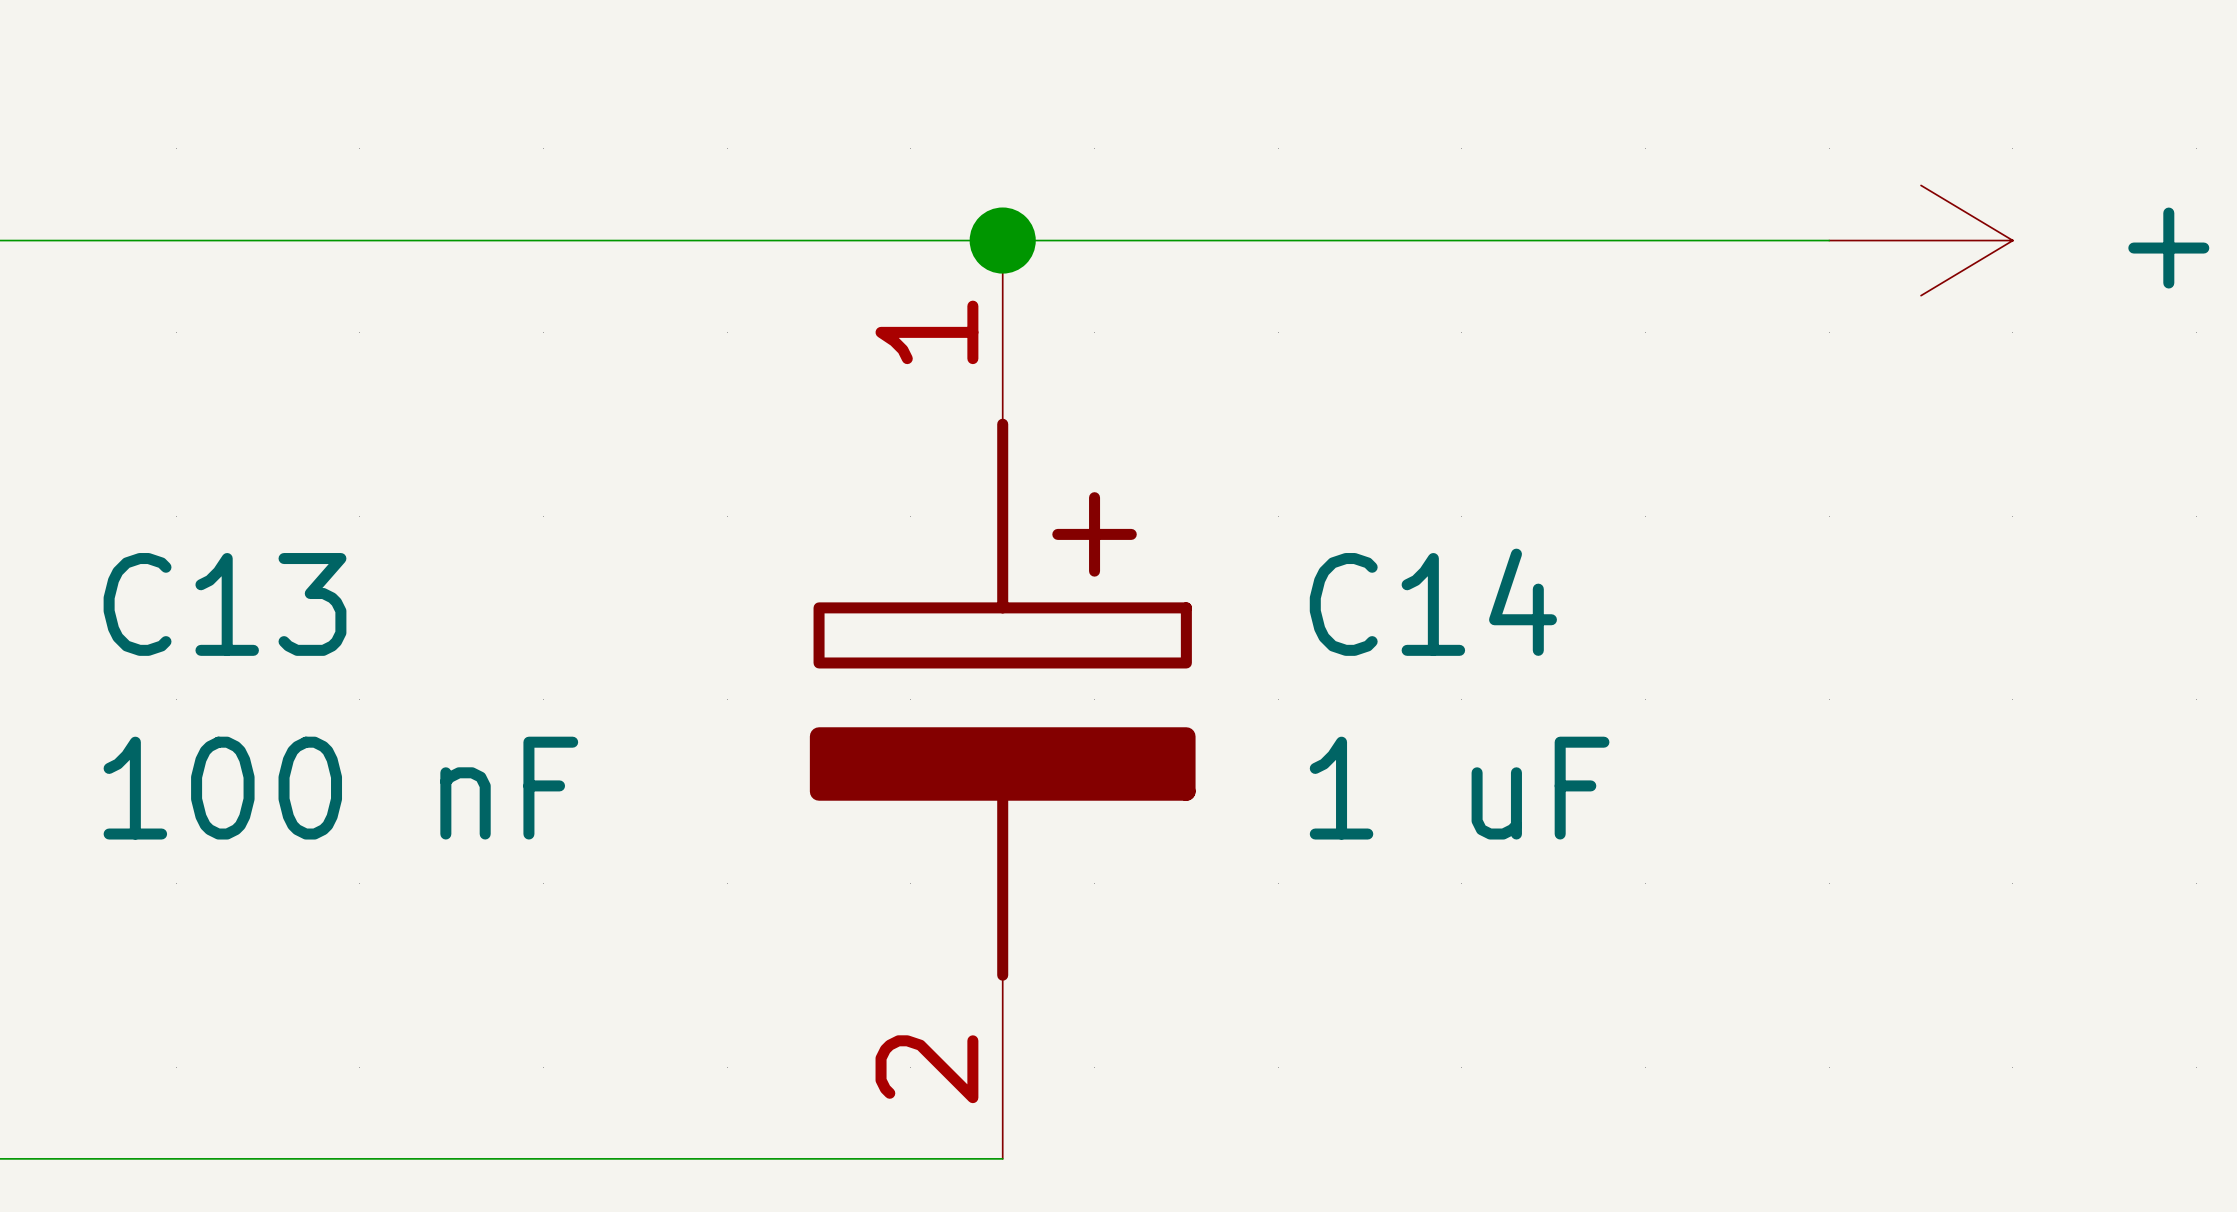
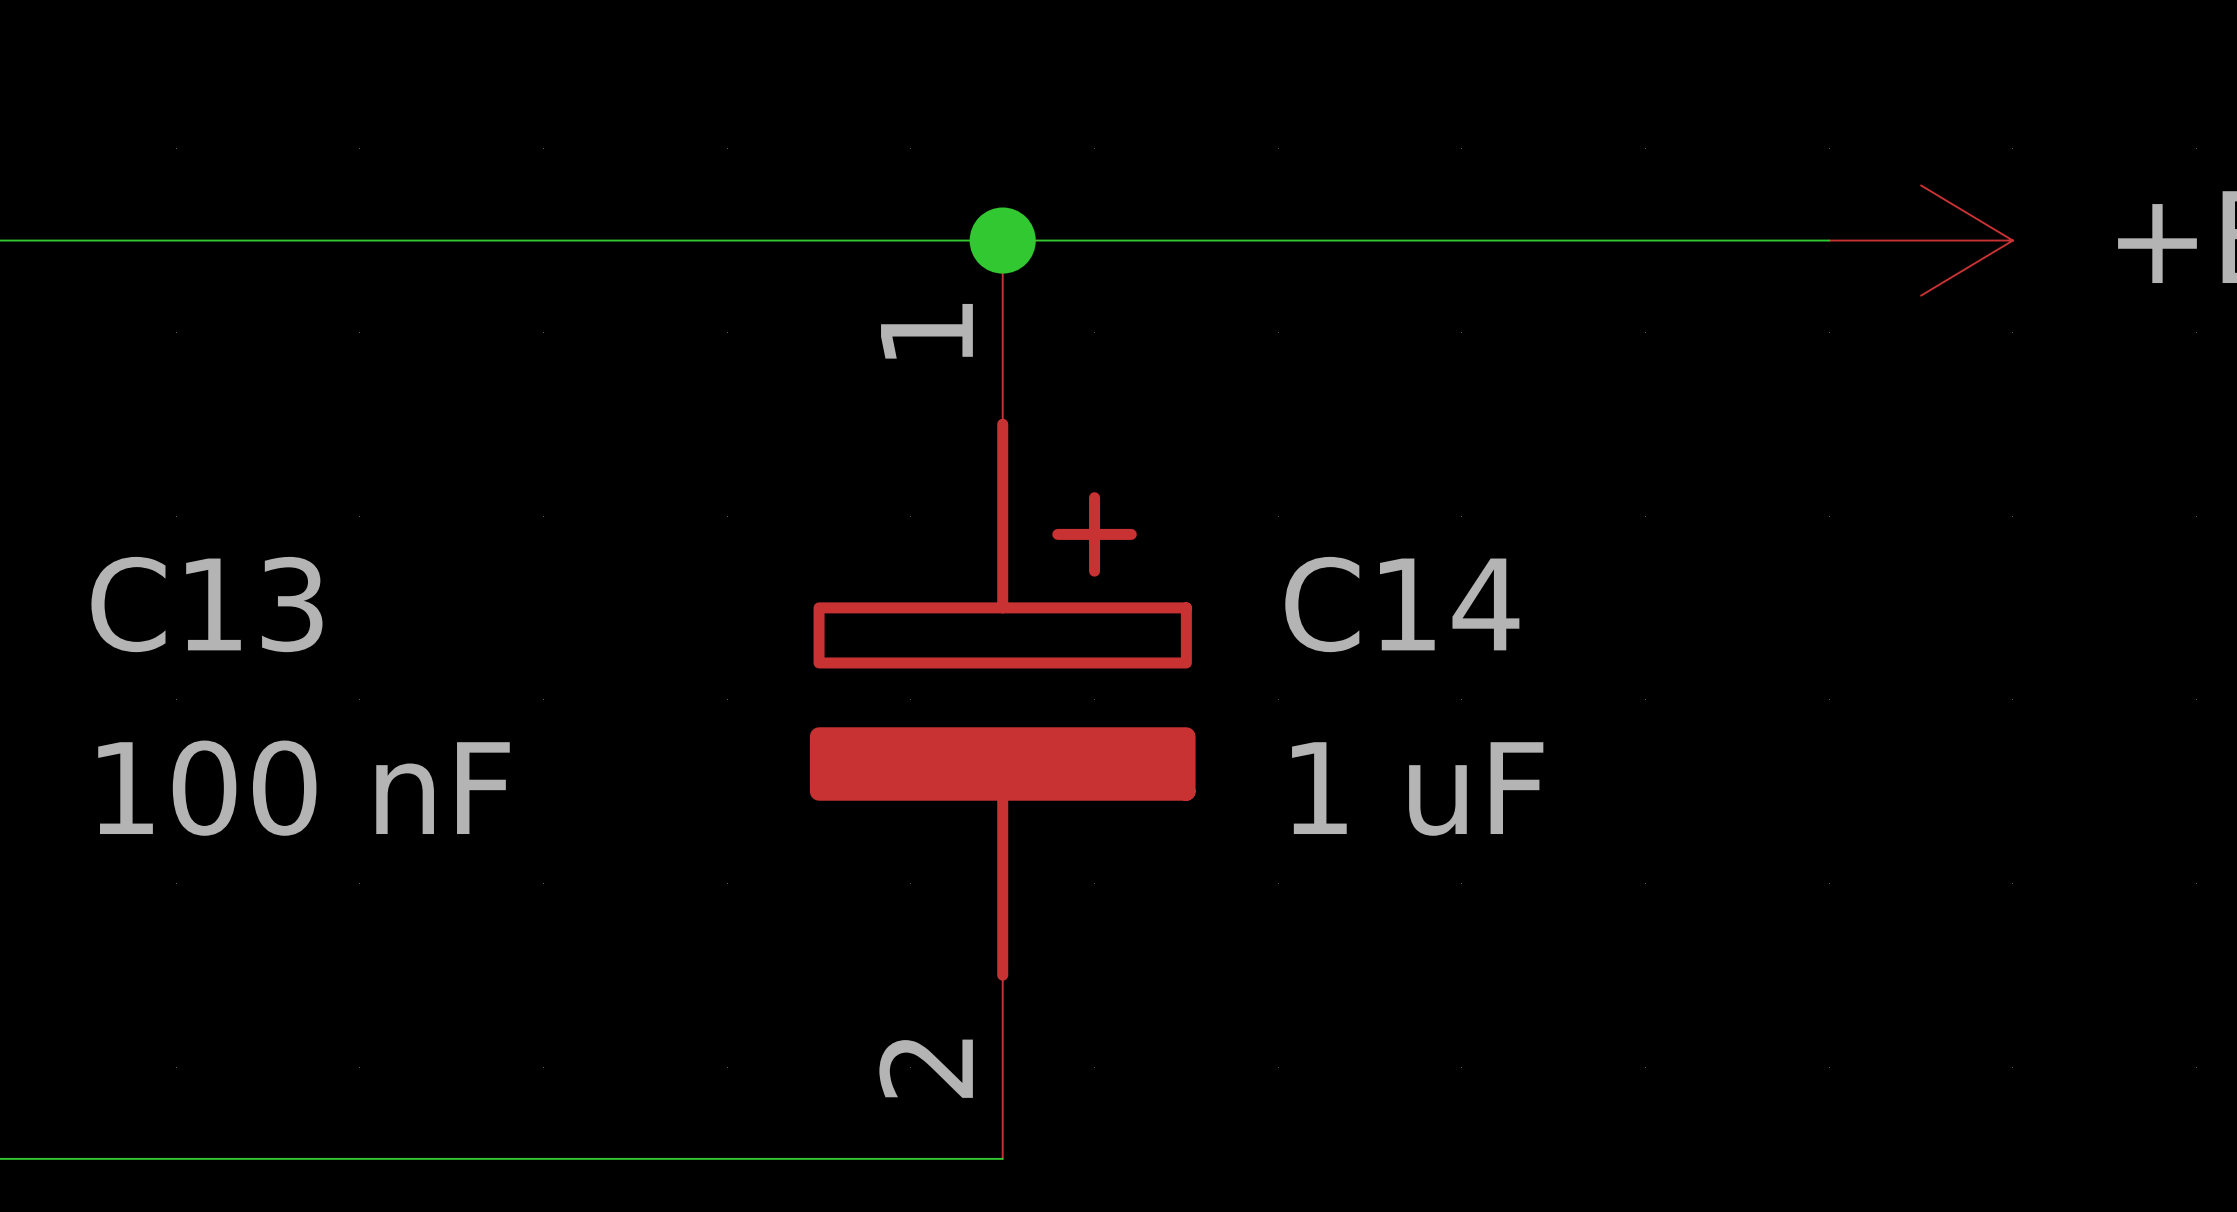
C14 name position: C14 (1433, 602) -> C14 (1402, 604)
C14 value position: 1 uF (1459, 788) -> 1 uF (1417, 789)

